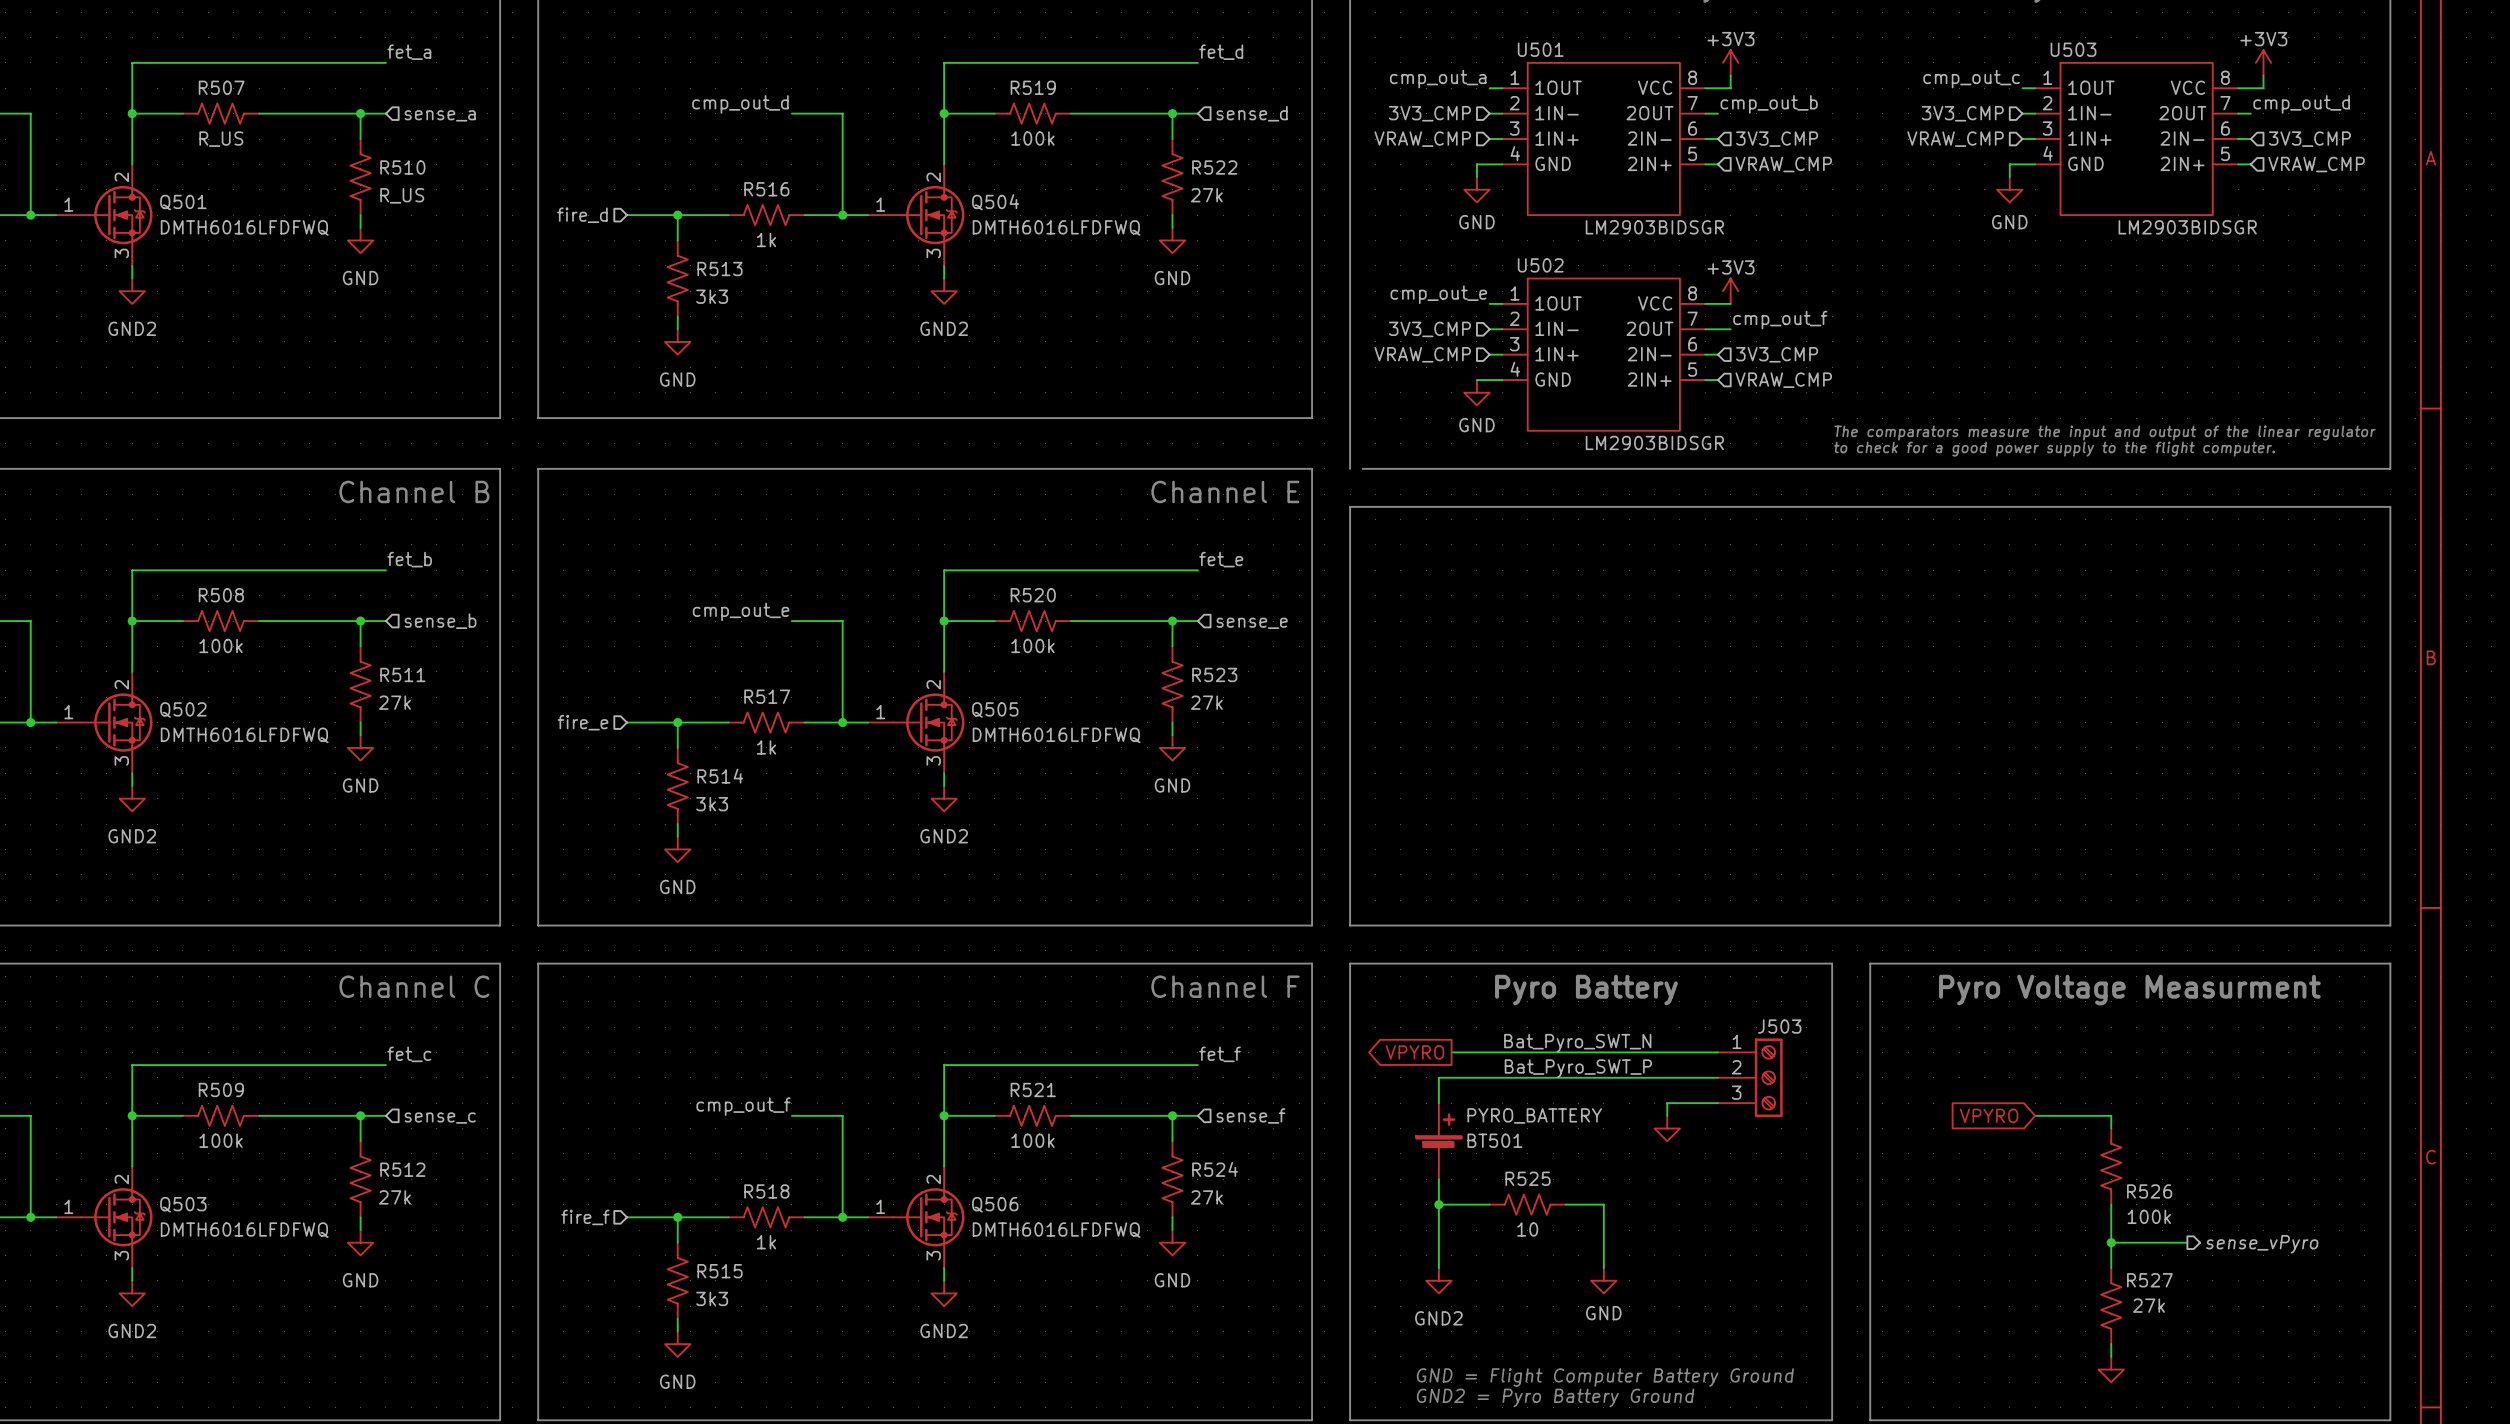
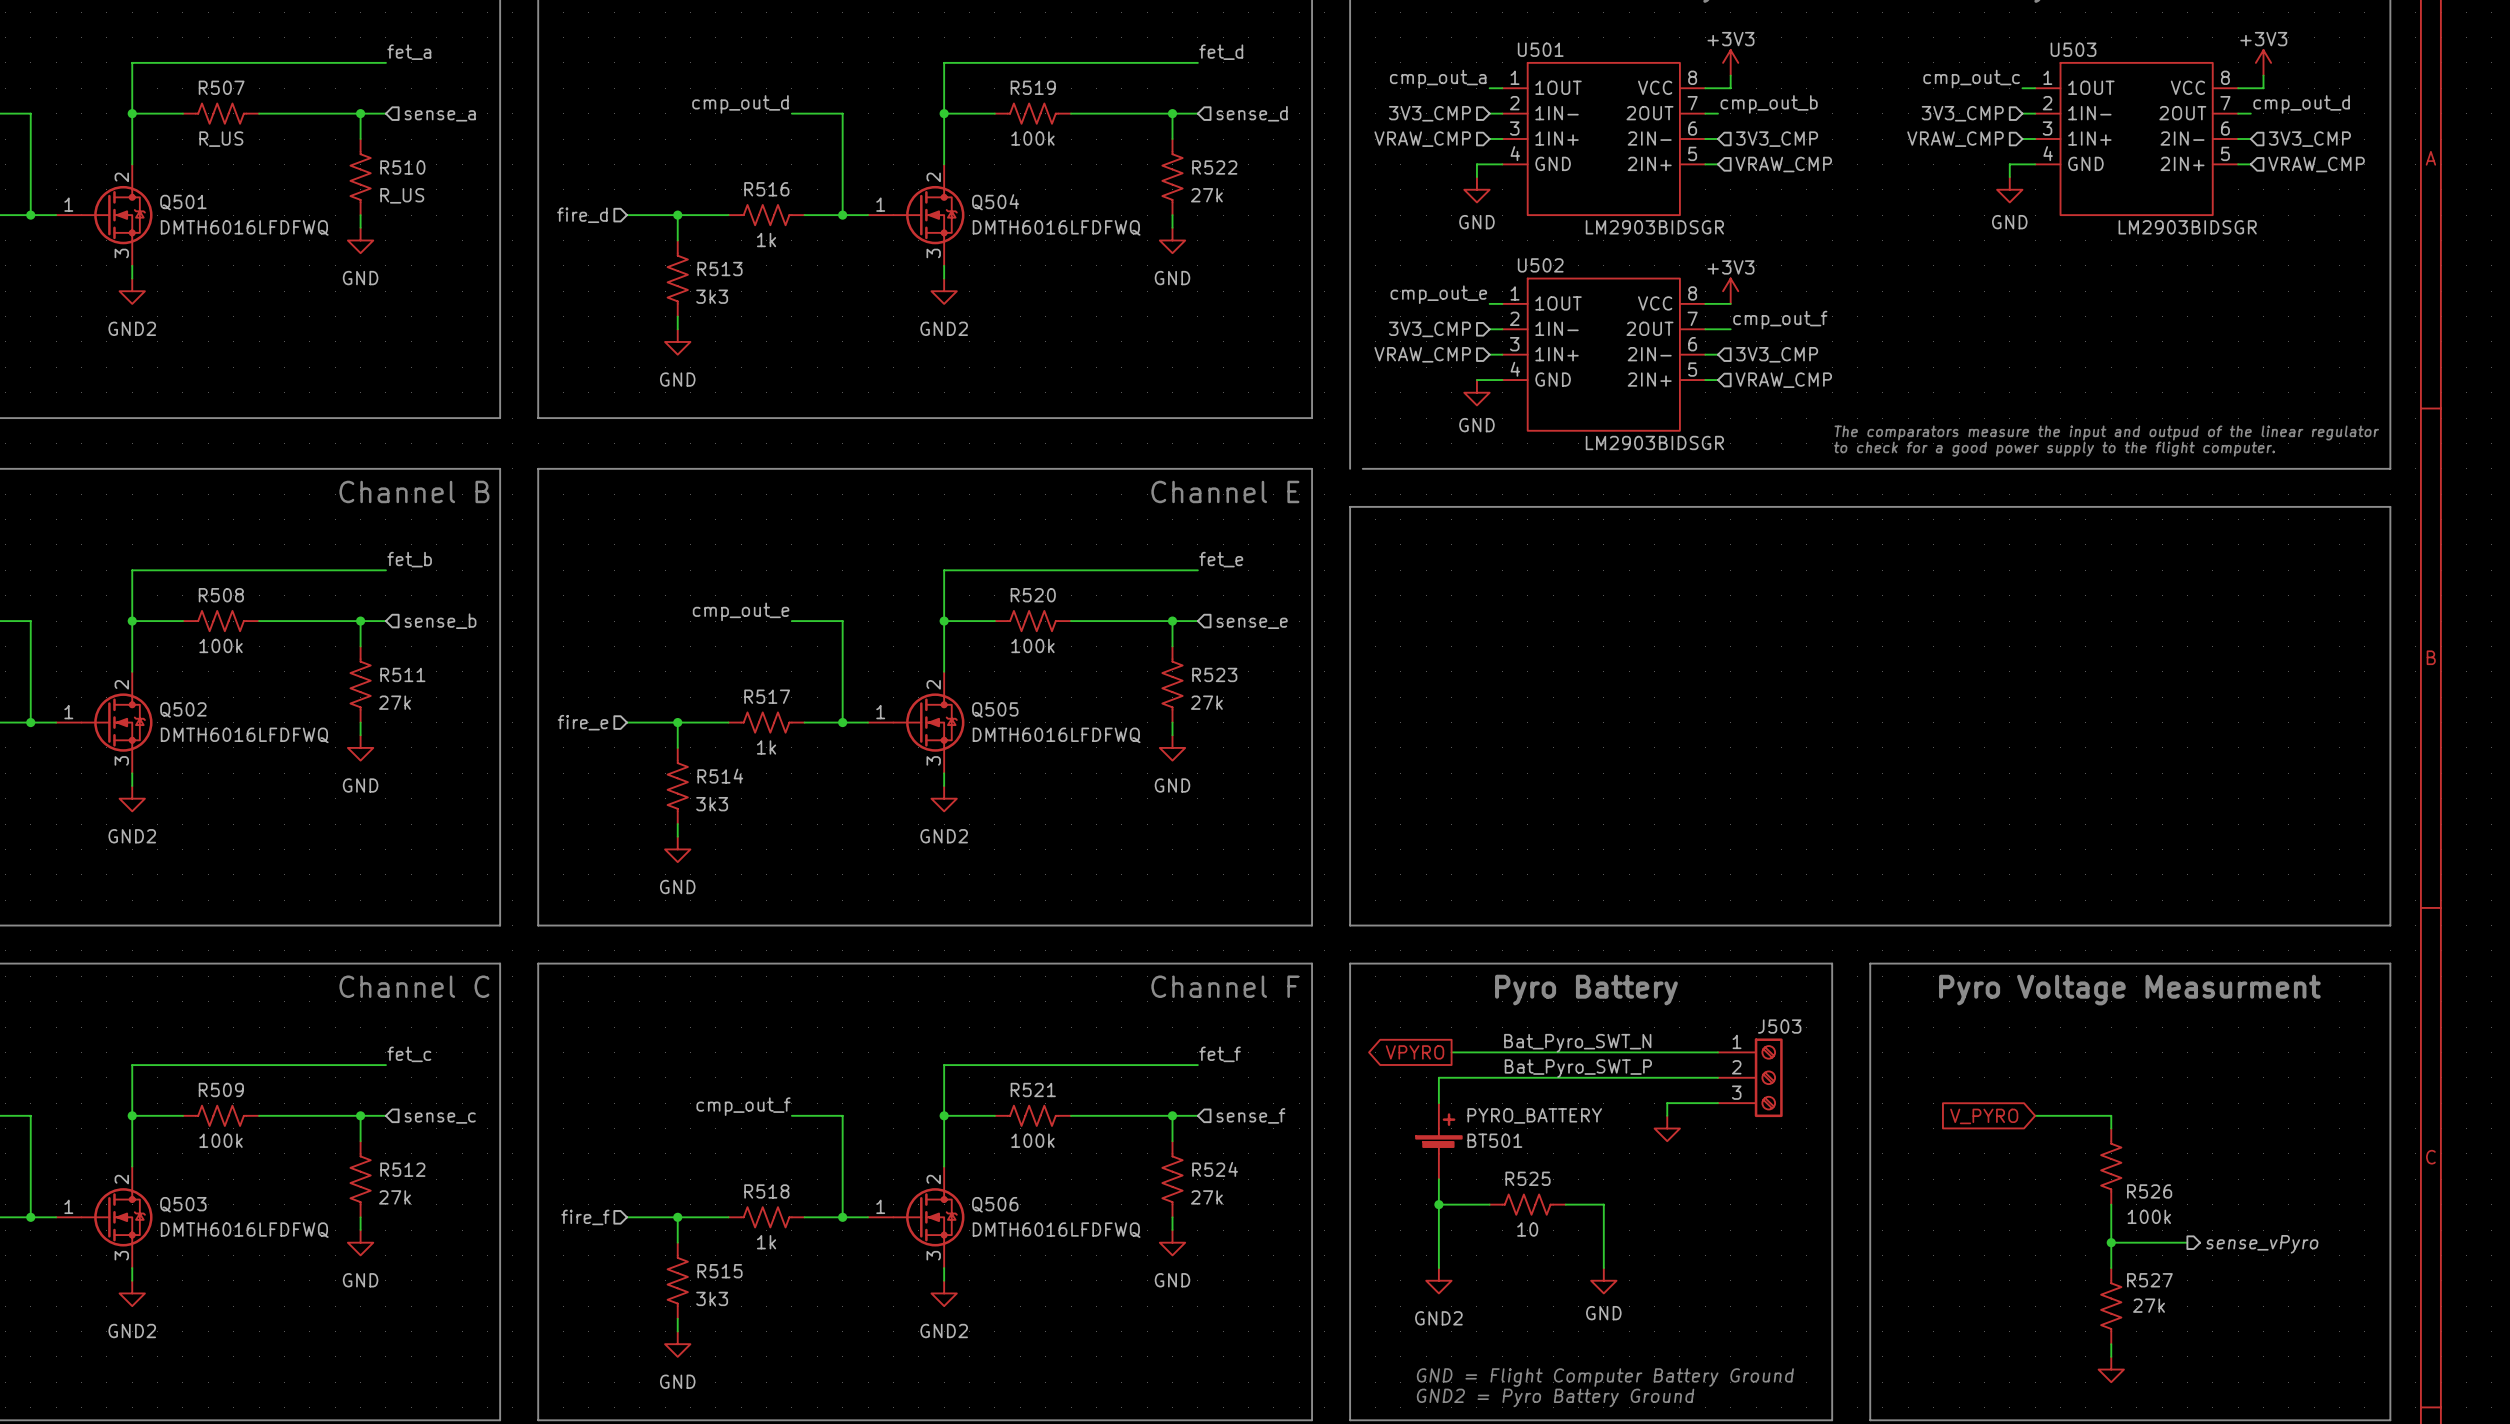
text: The comparators measure the input and output of the linear regulator (2105, 433) -> The comparators measure the input and outpud of the linear regulator (2106, 433)
global label: VPYRO (1989, 1115) -> V_PYRO (1984, 1116)

